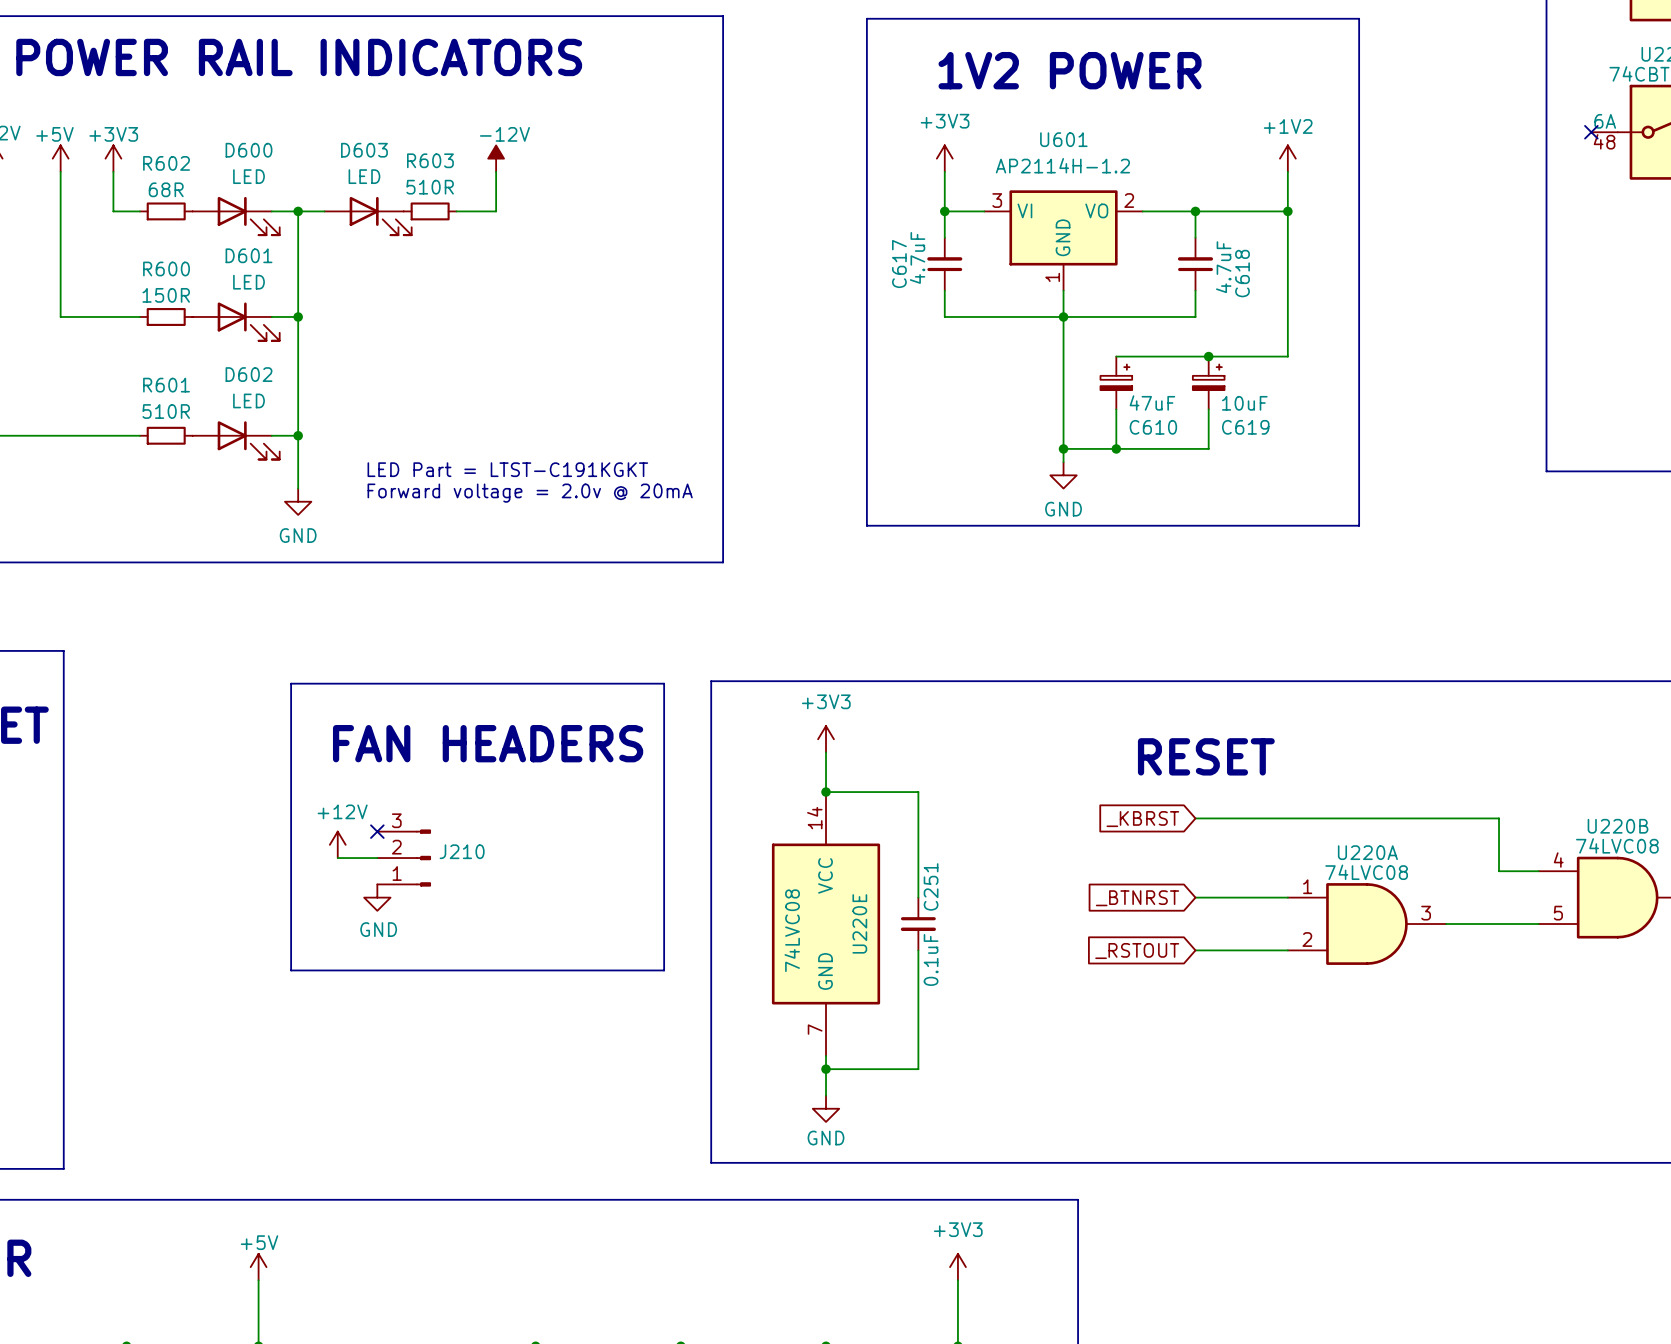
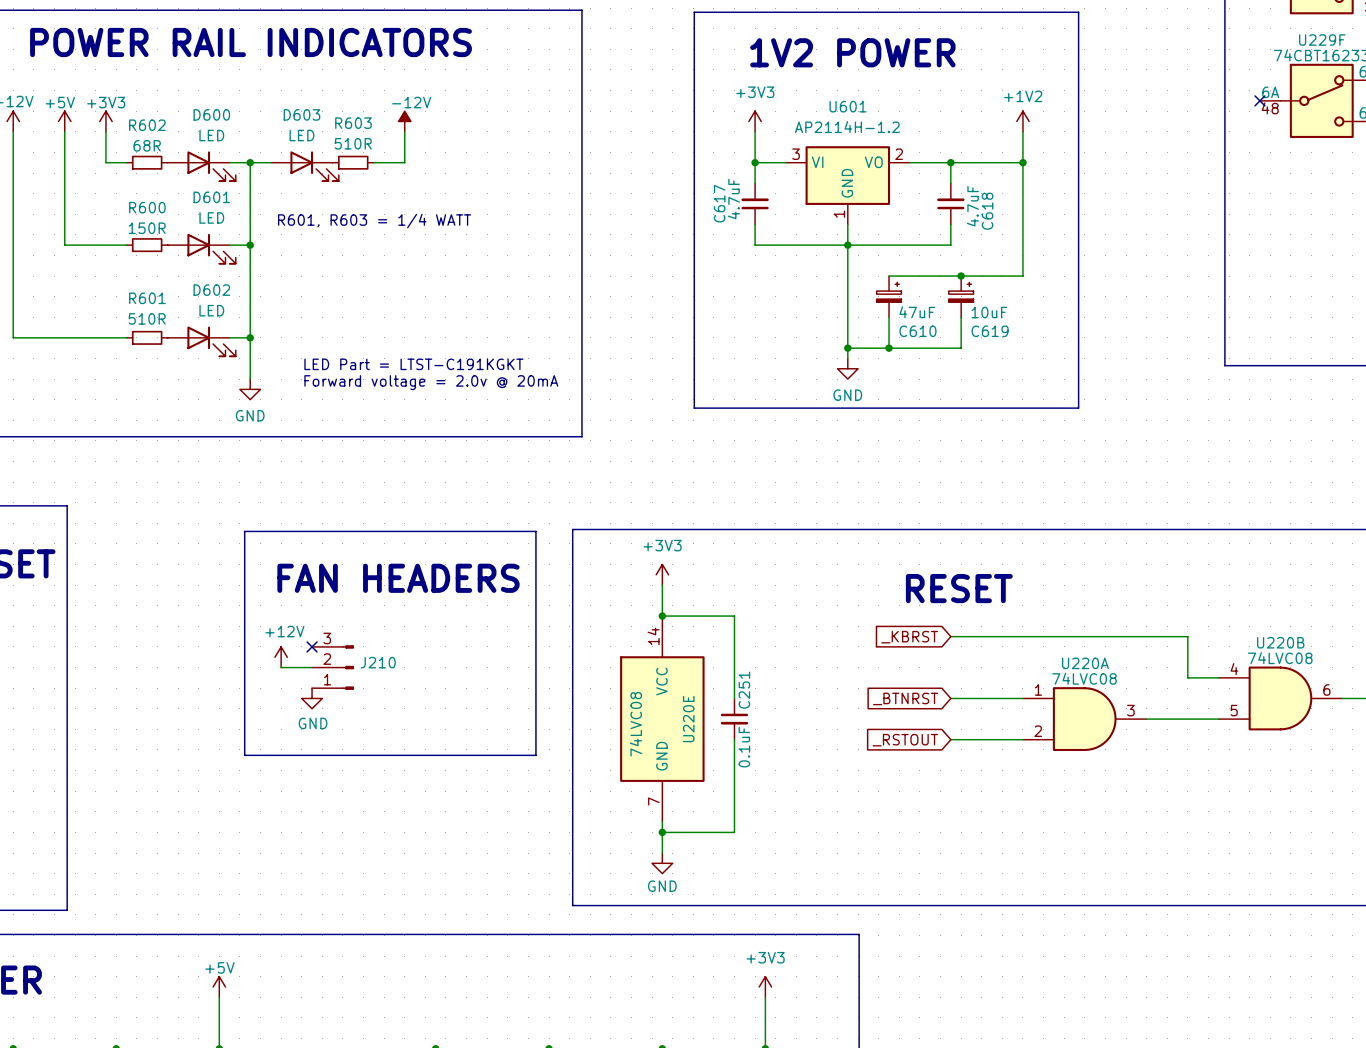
text: none -> R601, R603 = 1/4 WATT (374, 221)

